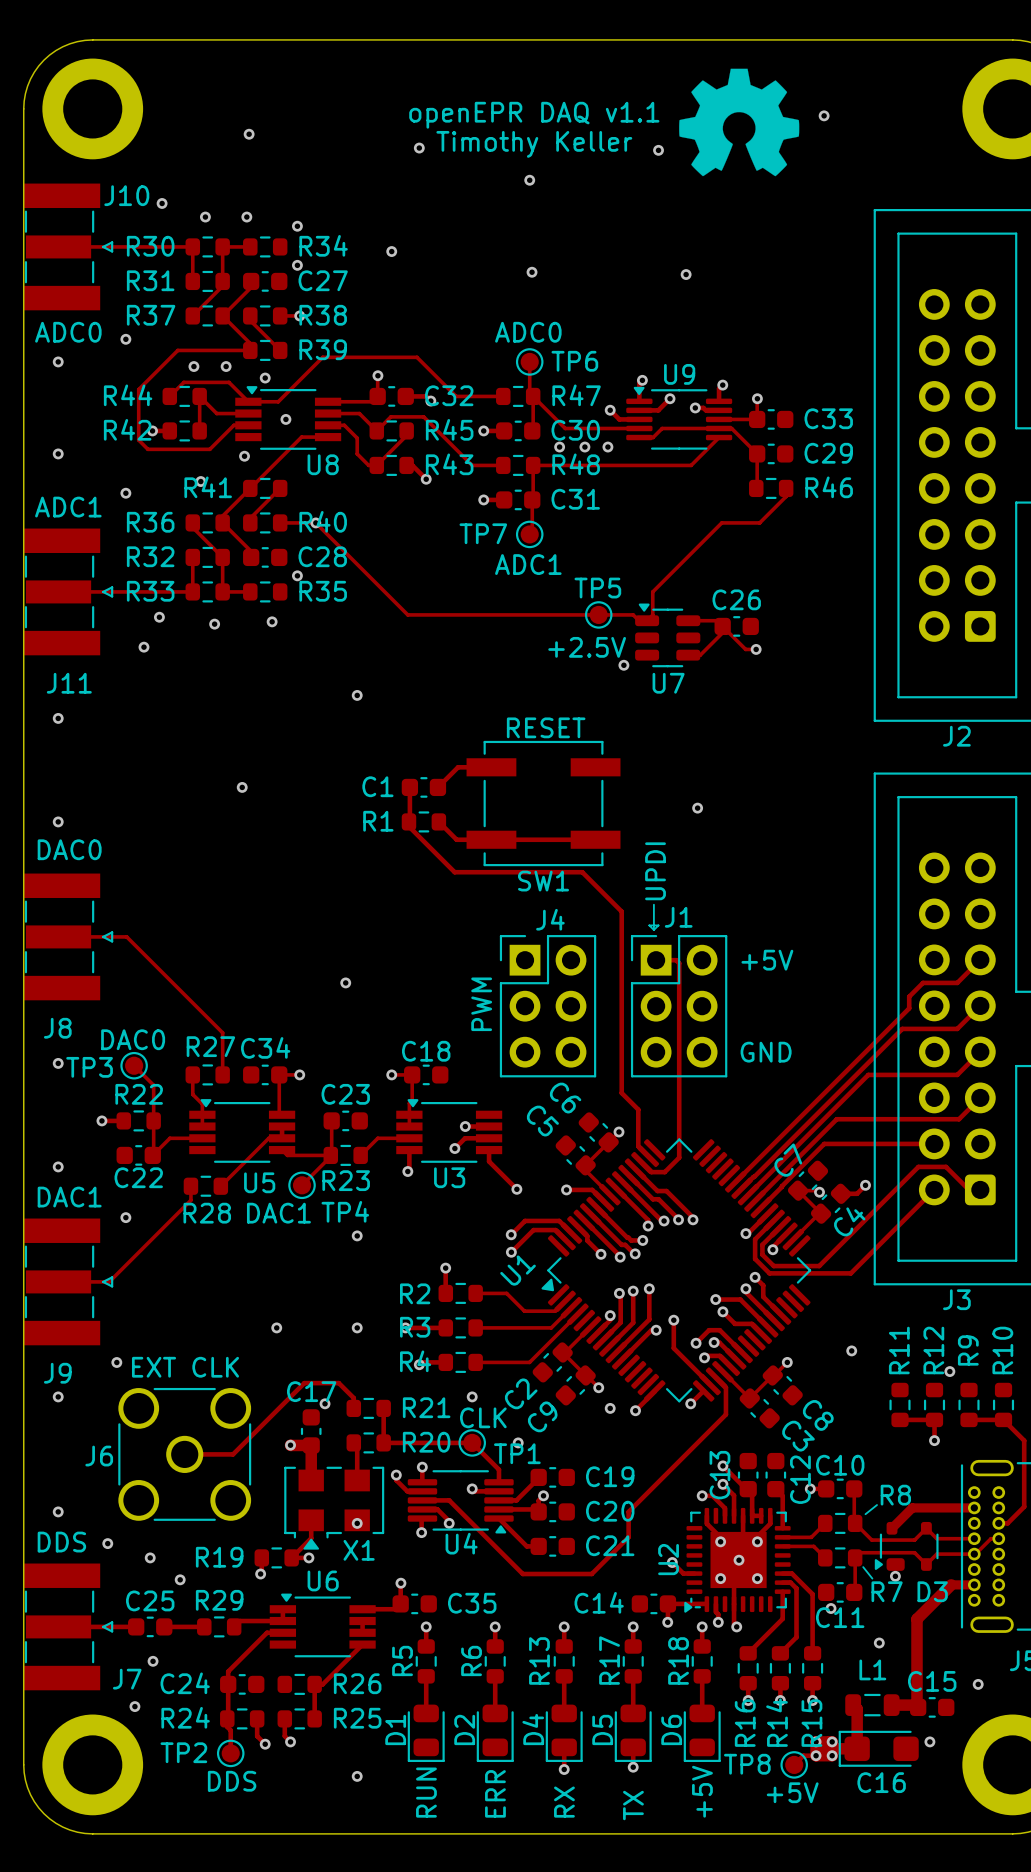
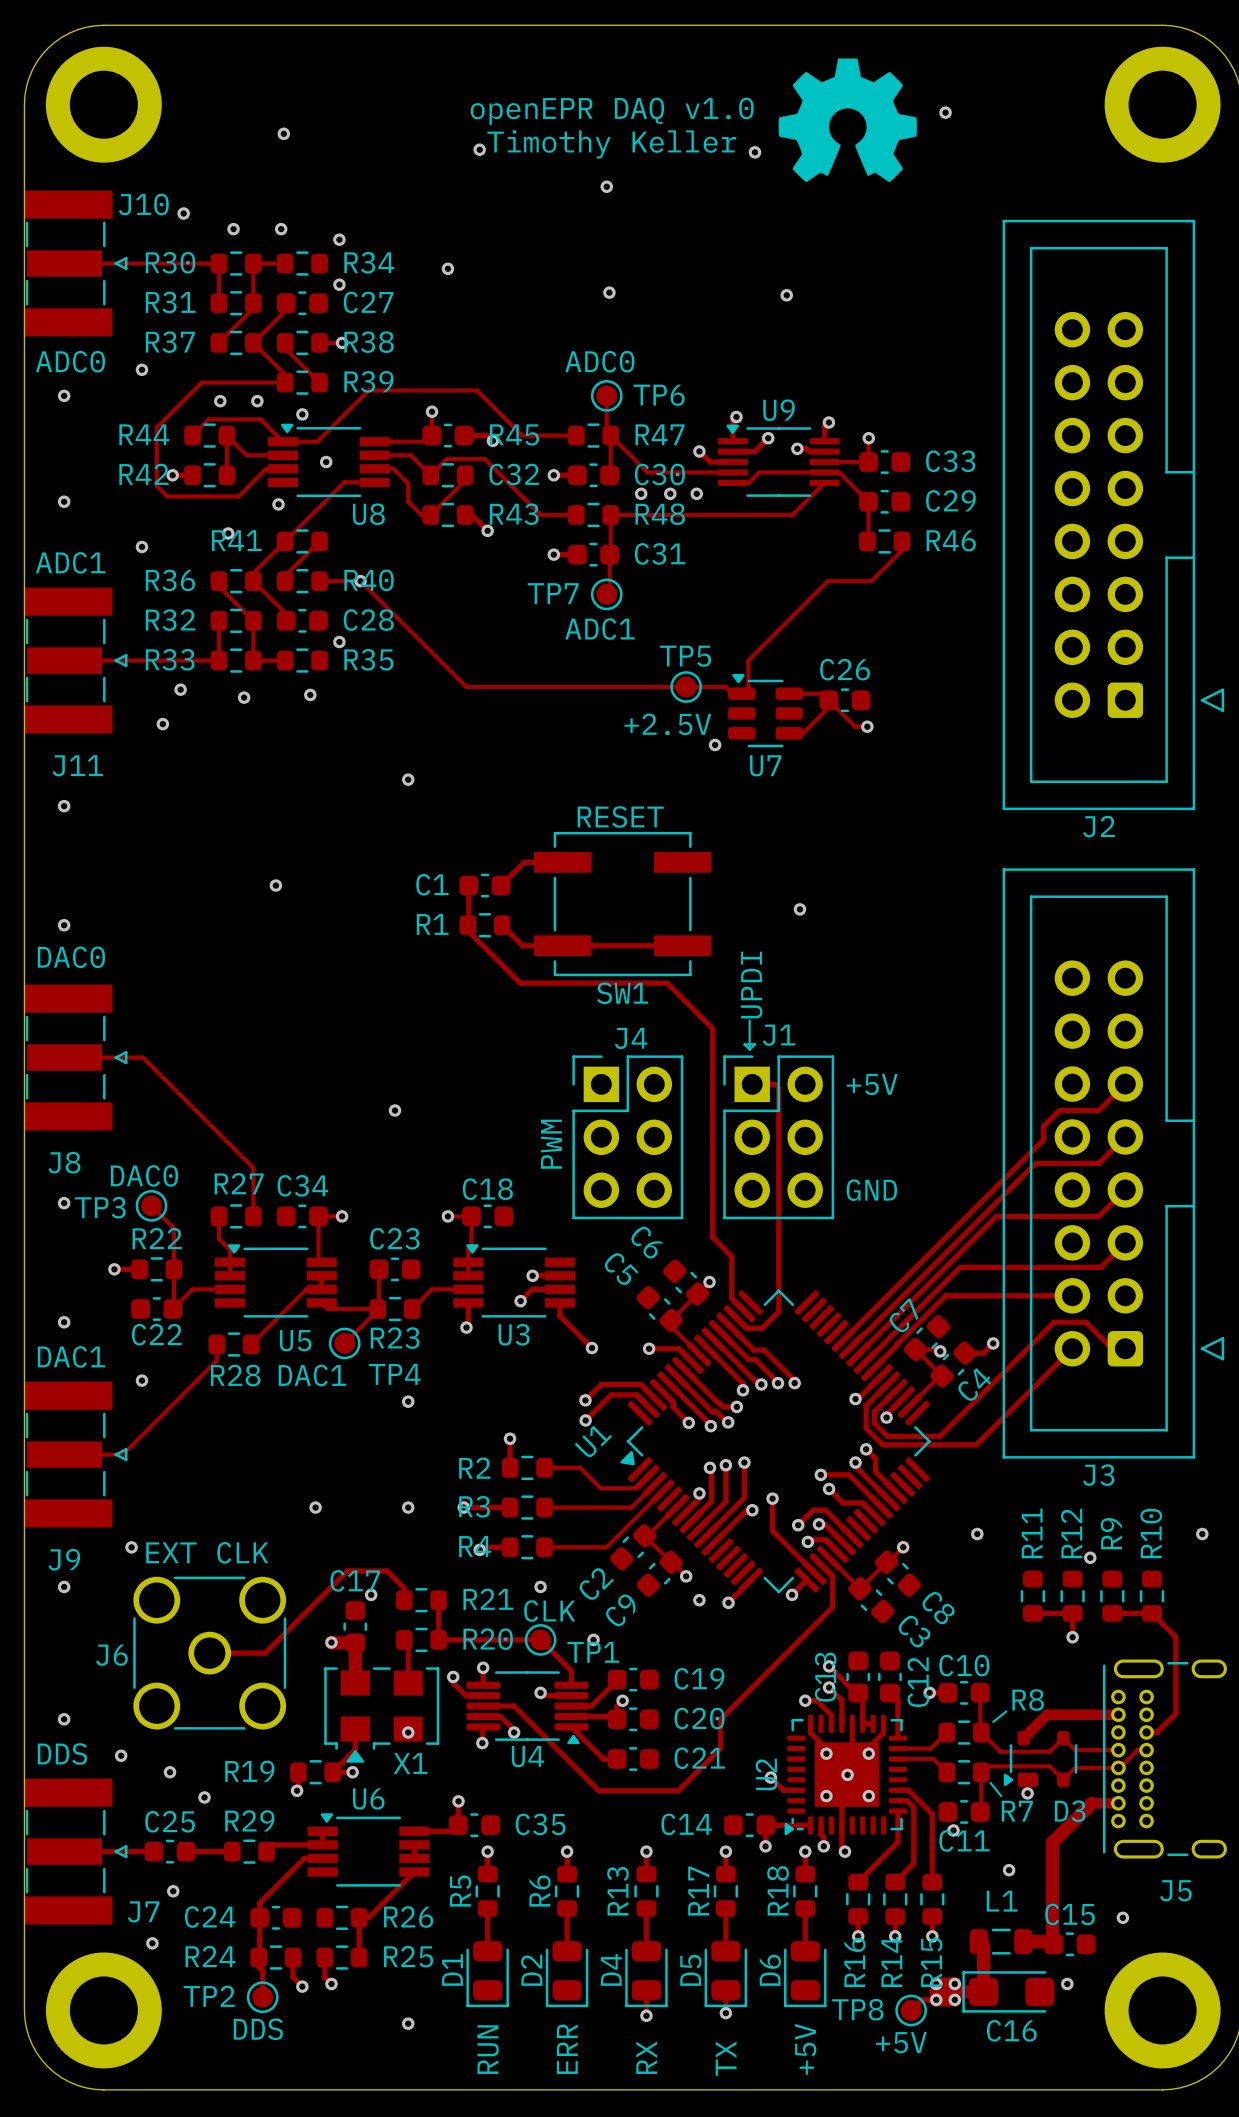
text: openEPR DAQ v1.1 (534, 115) -> openEPR DAQ v1.0 (612, 111)
C32 name position: C32 (449, 395) -> C32 (514, 474)
R45 name position: R45 (449, 429) -> R45 (514, 434)

